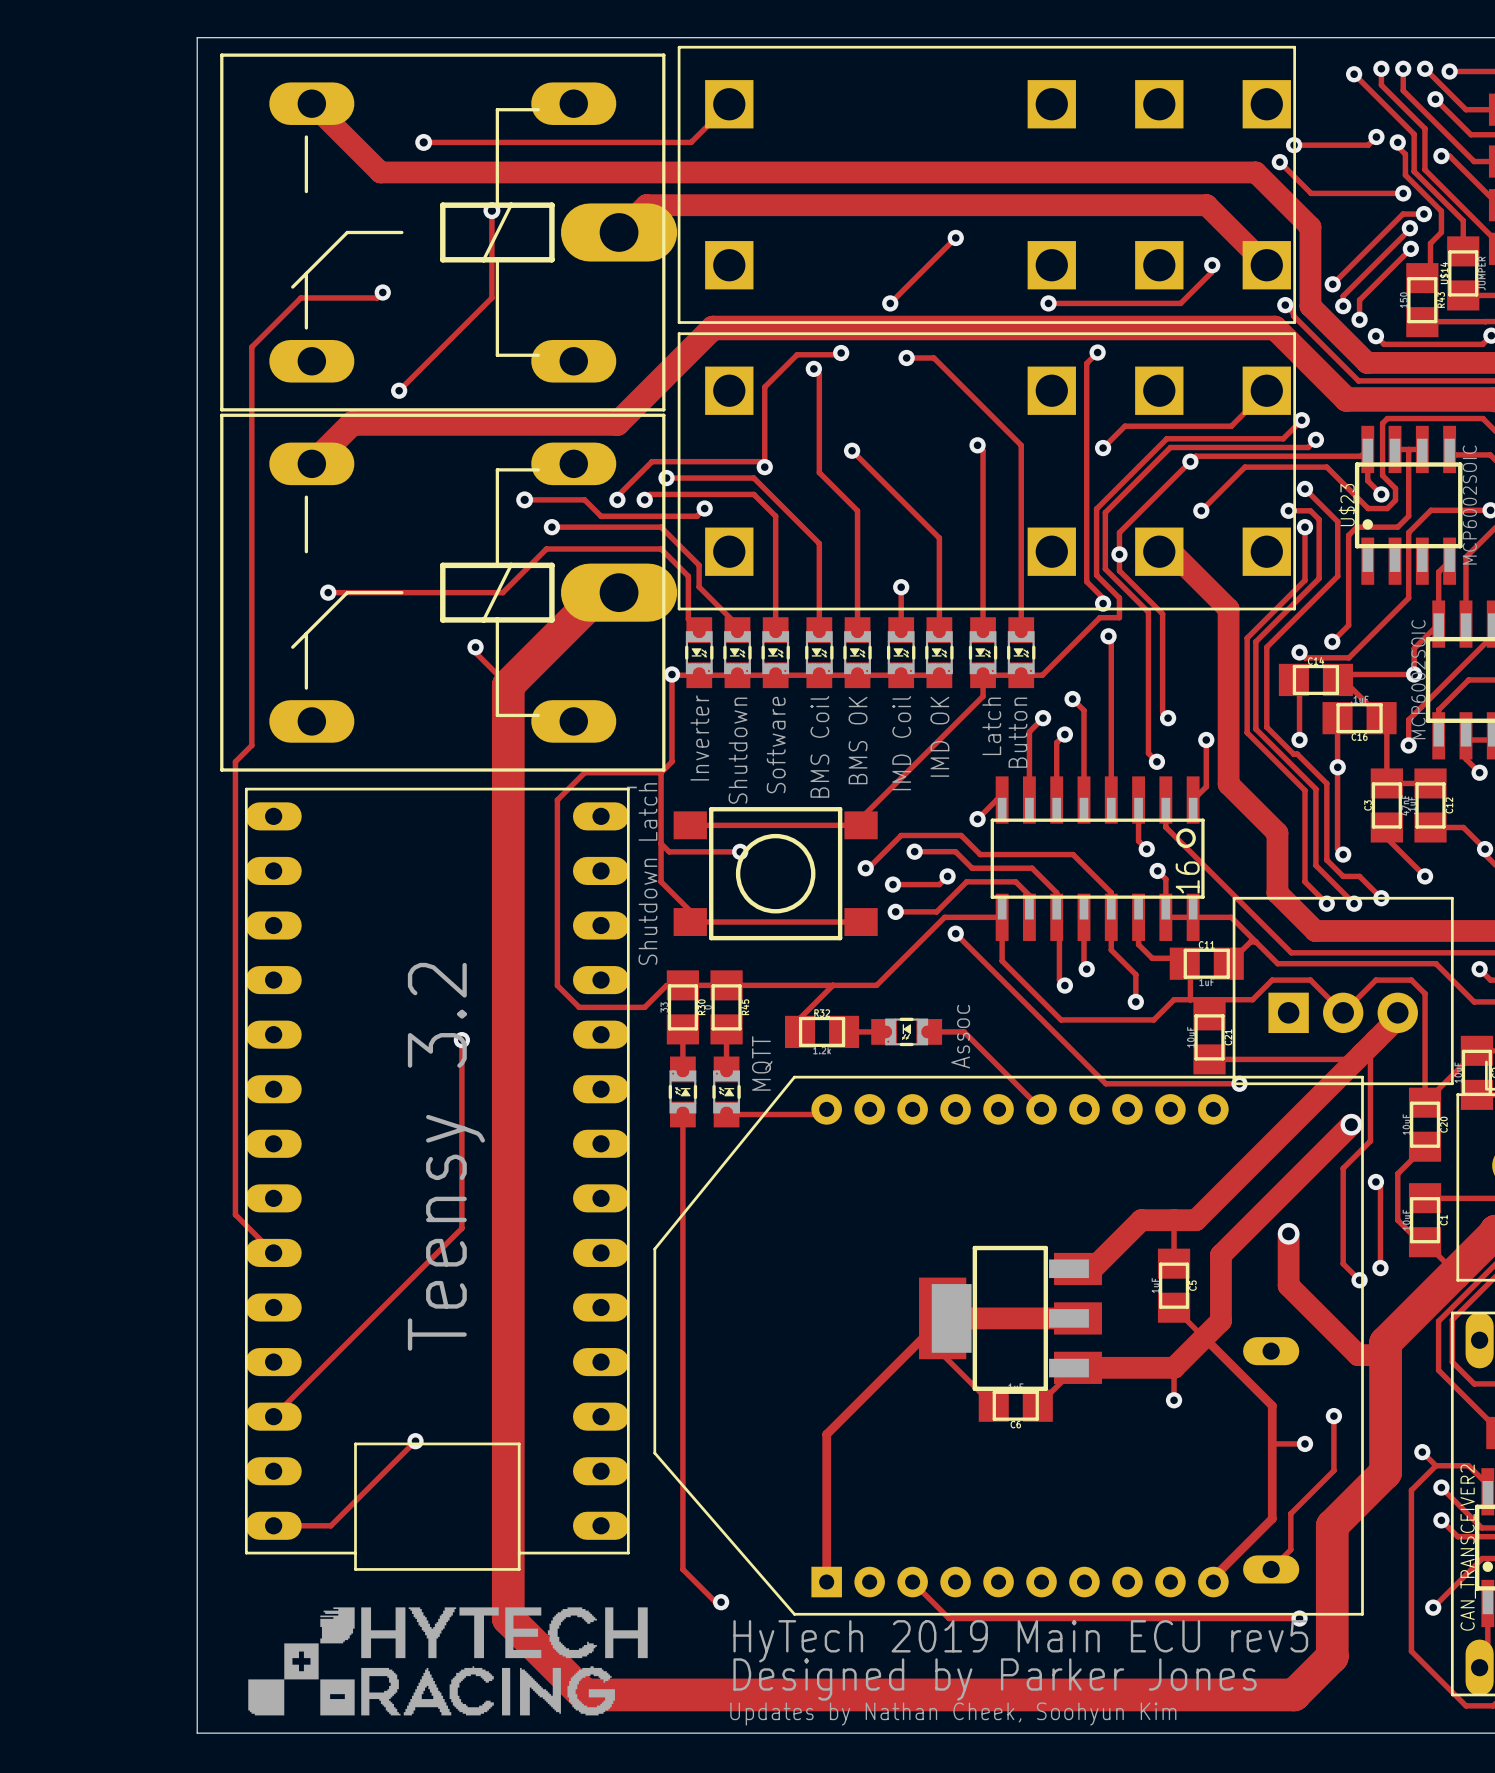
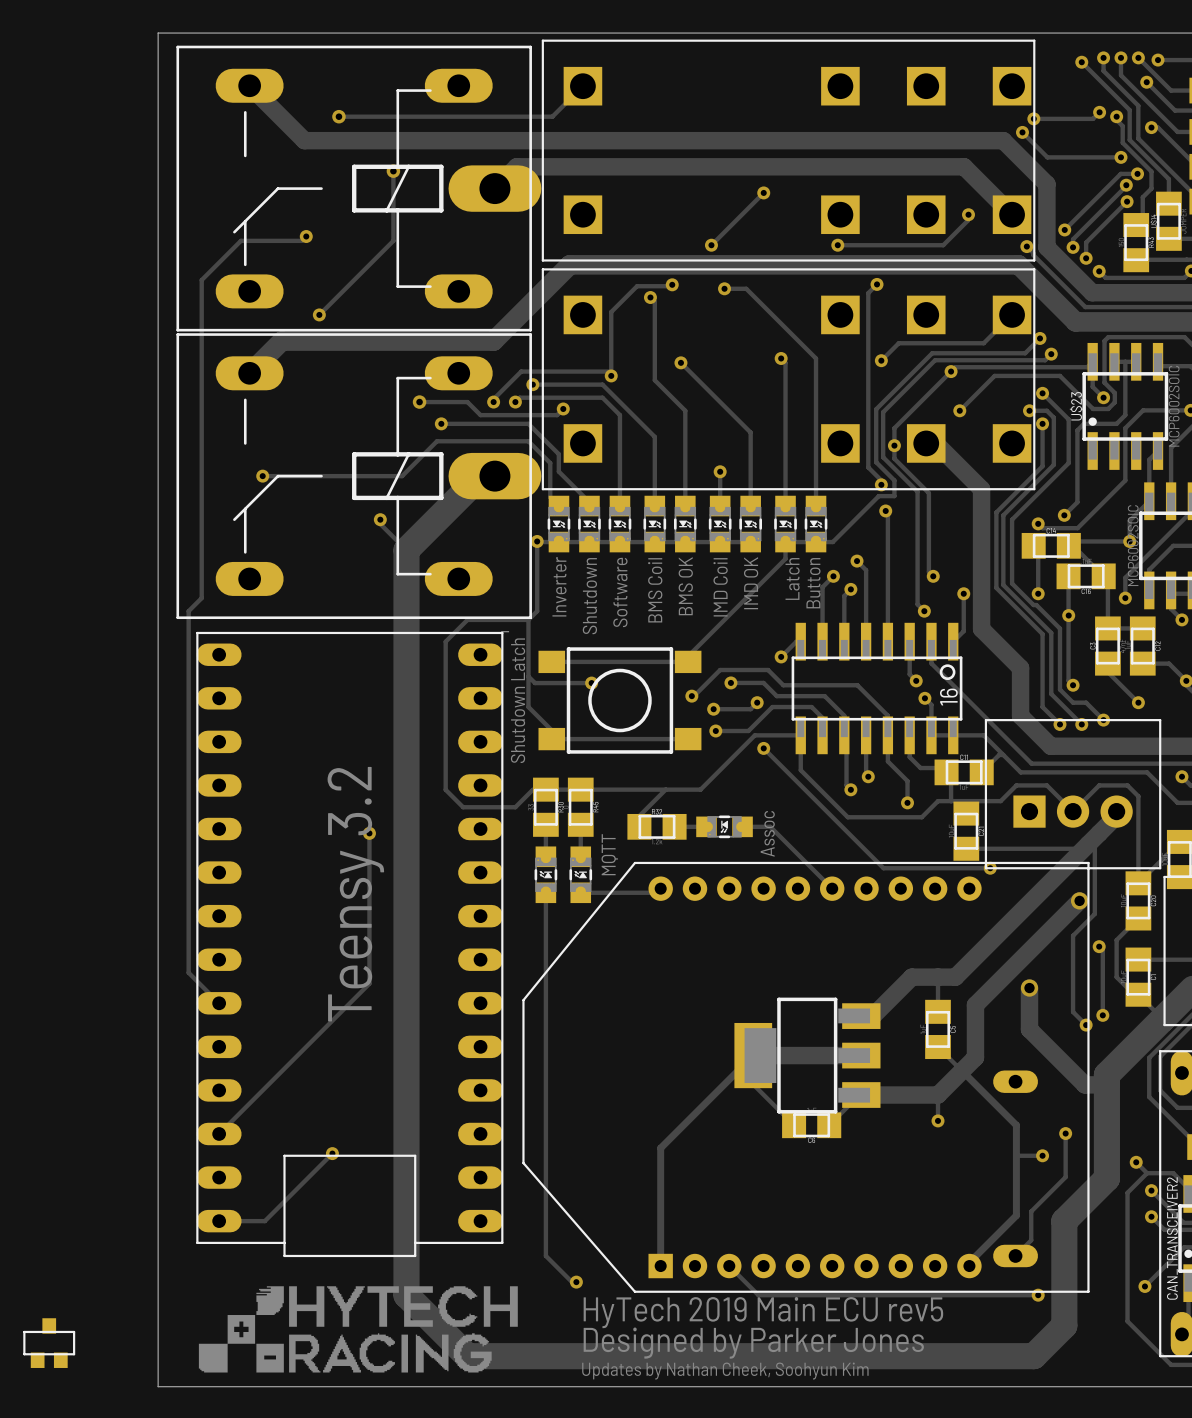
part: none -> (49, 1343)

